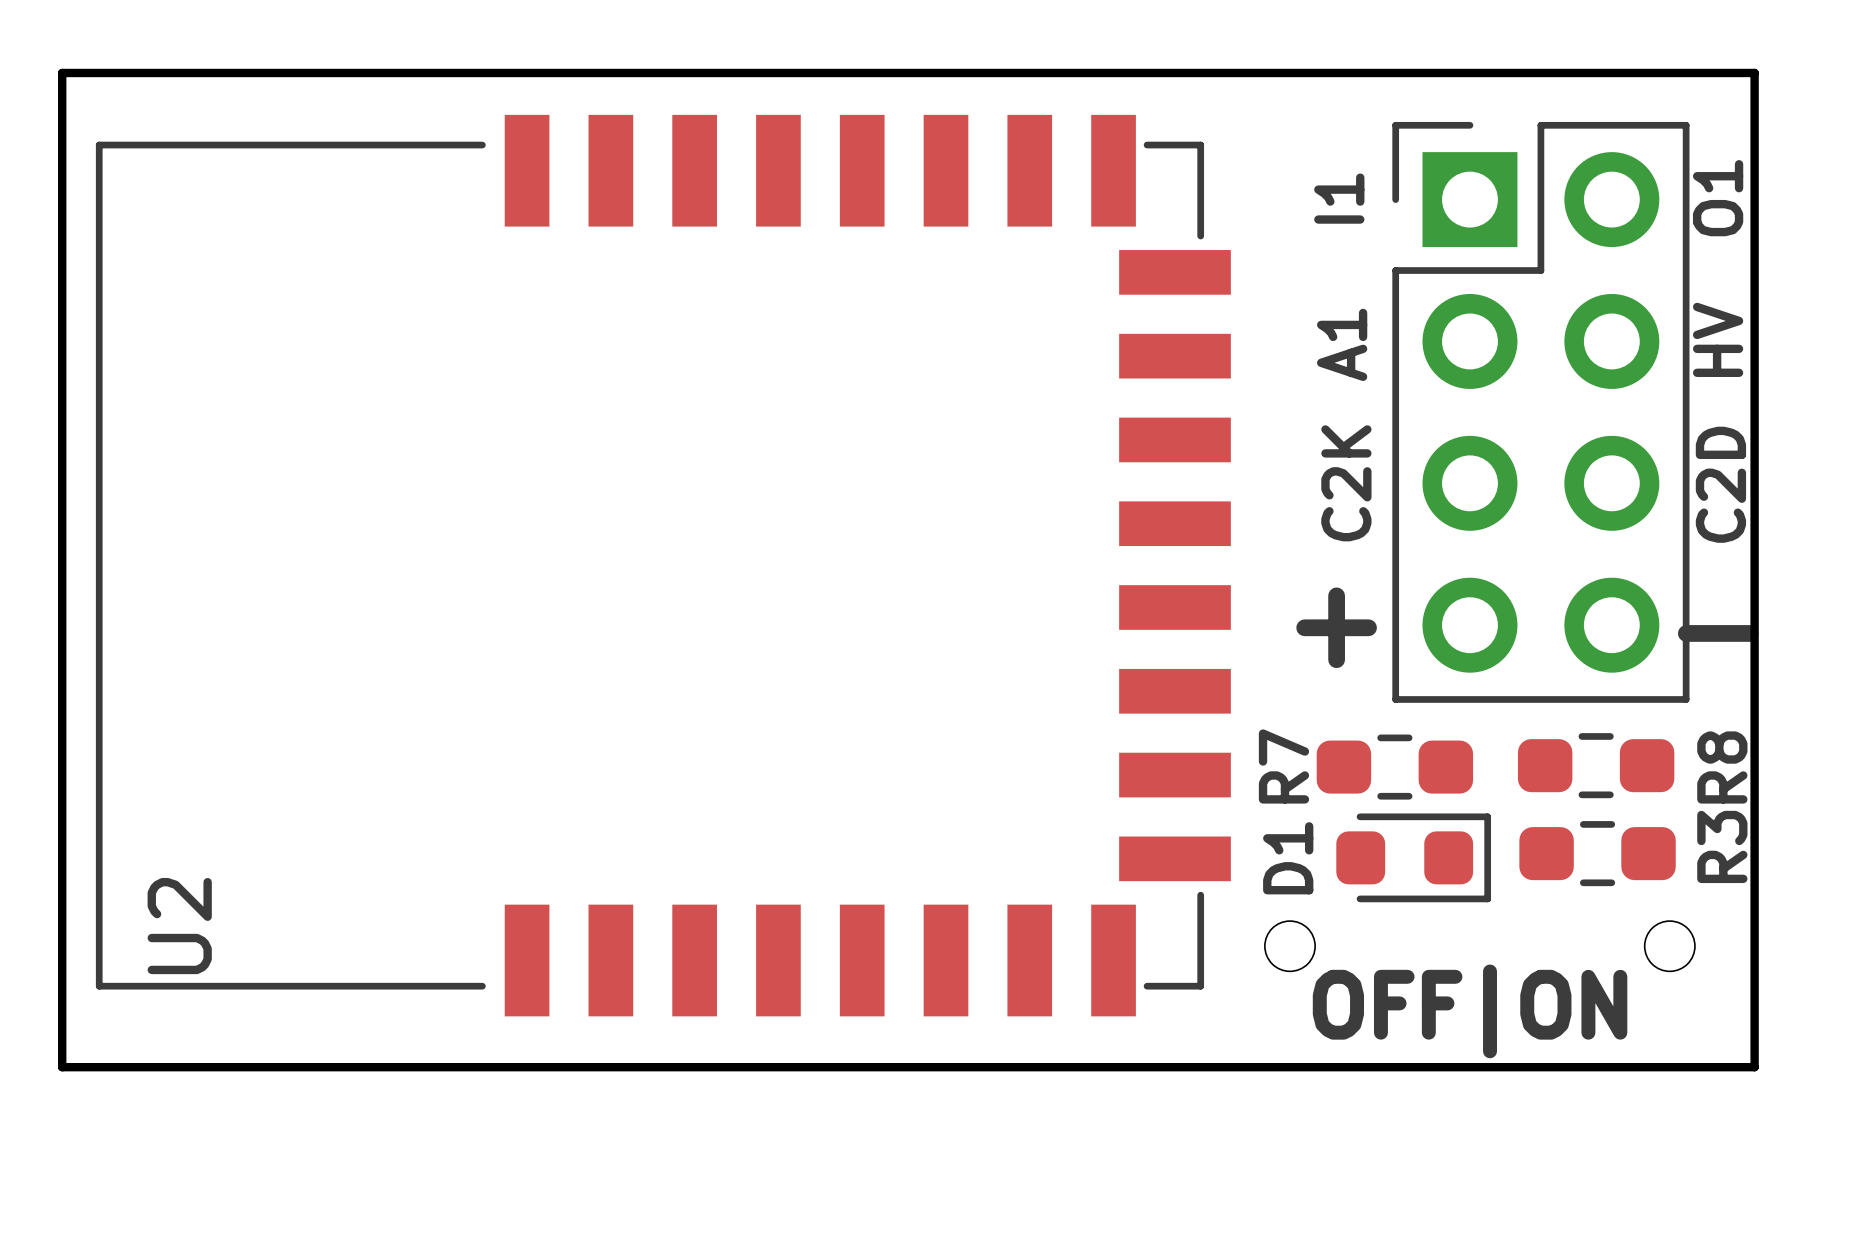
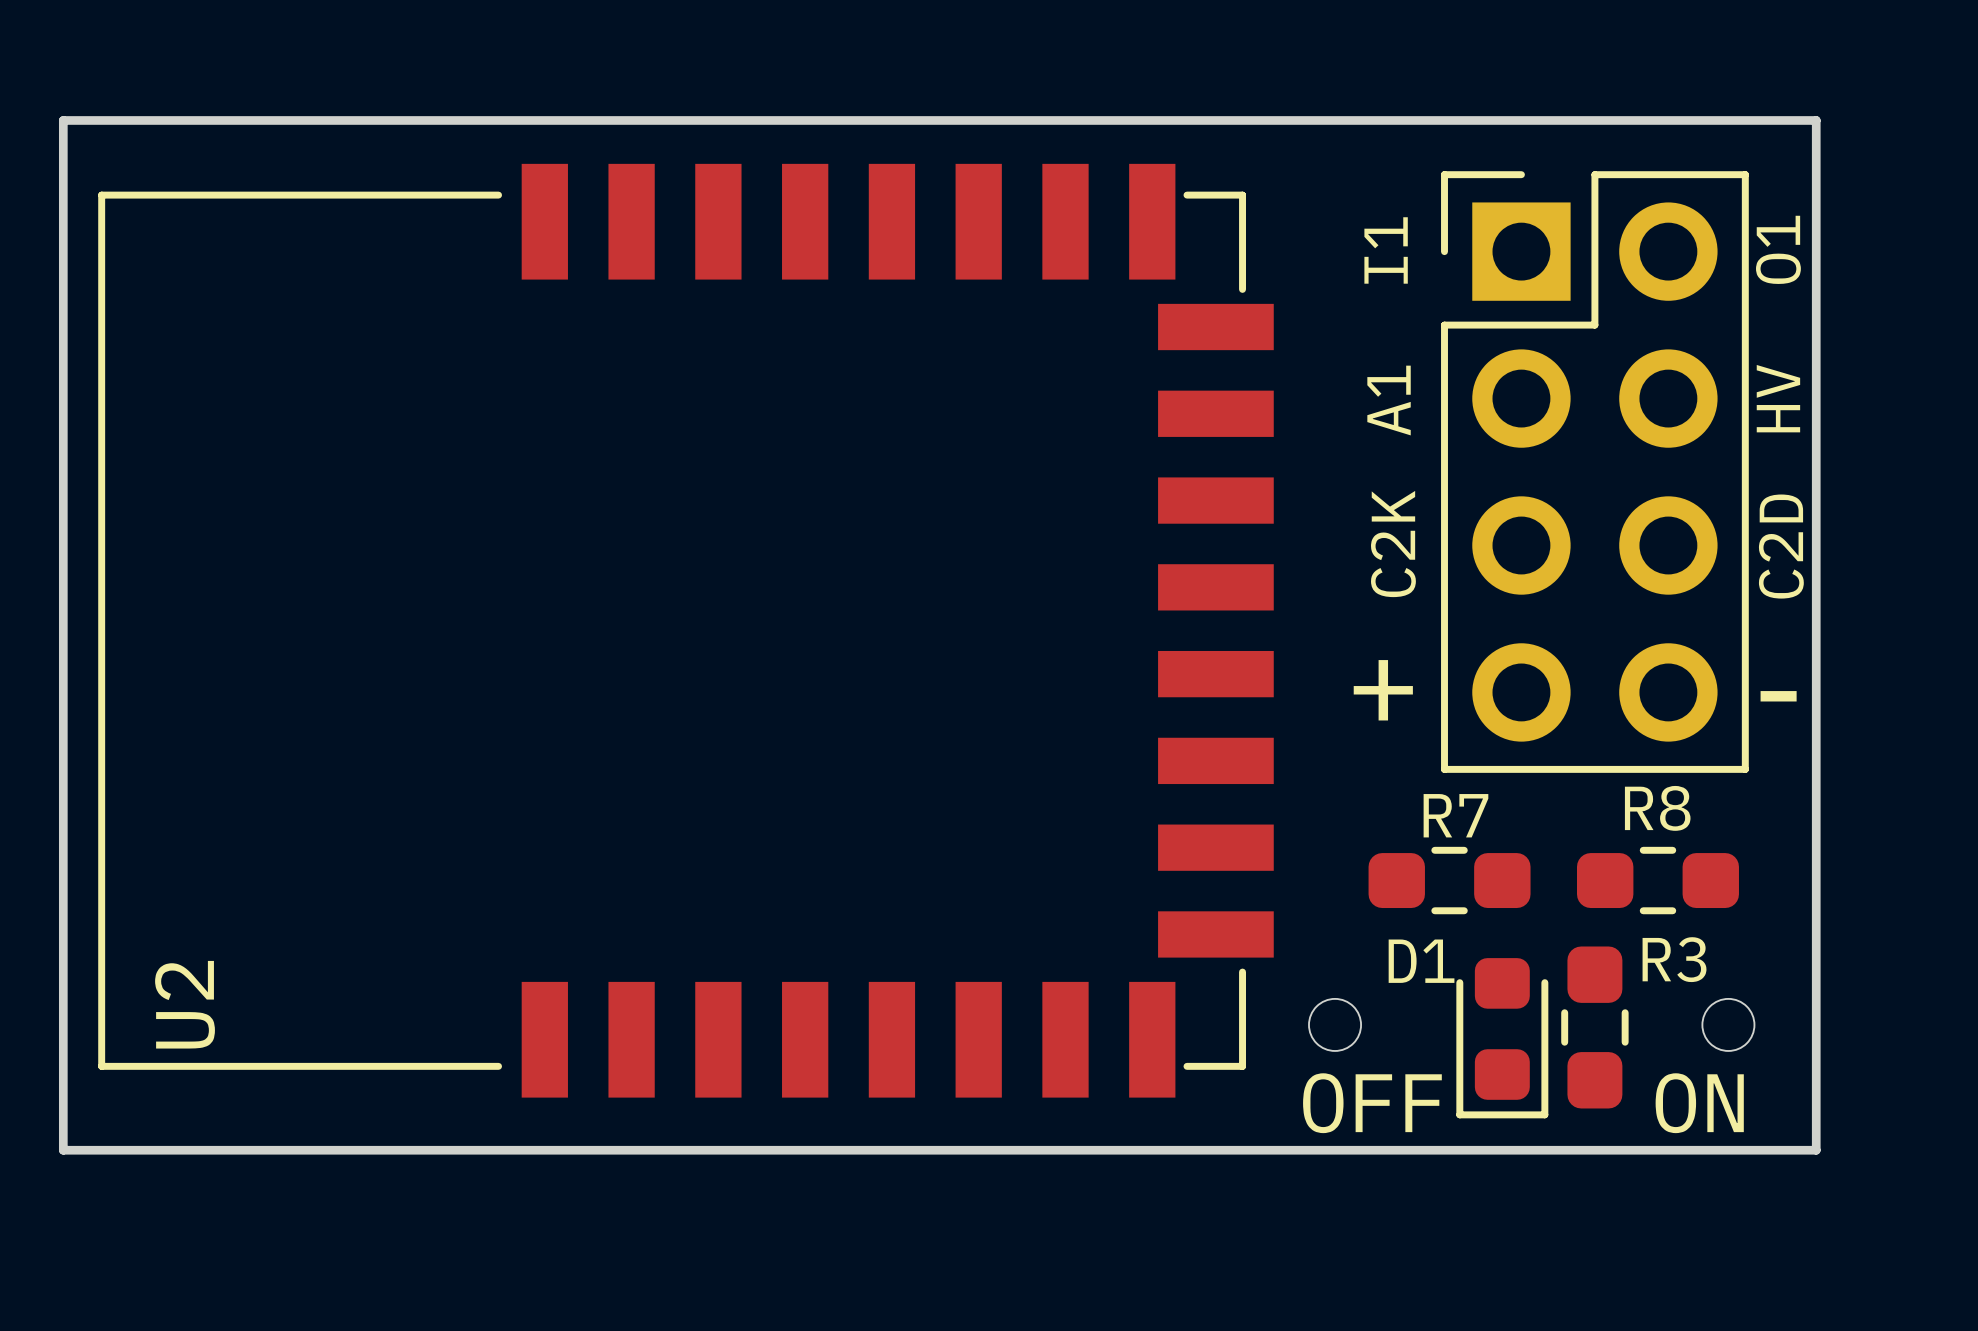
R8 position: (1596, 765) -> (1657, 880)
R7 name rotation: 0° (1283, 766) -> 90° clockwise (1455, 815)
R7 name position: R7 (1283, 766) -> R7 (1455, 815)
R7 position: (1394, 767) -> (1449, 880)
R8 name rotation: 0° (1722, 767) -> 90° clockwise (1657, 808)
R8 name position: R8 (1722, 767) -> R8 (1657, 808)
R3 rotation: 0° (1597, 853) -> 90° clockwise (1594, 1027)
R3 position: (1597, 853) -> (1594, 1027)
D1 rotation: 0° (1413, 857) -> 90° clockwise (1502, 1038)
D1 position: (1413, 857) -> (1502, 1038)
text: OFF|ON (1470, 1011) -> OFF (1372, 1103)
text: none -> ON (1699, 1103)

